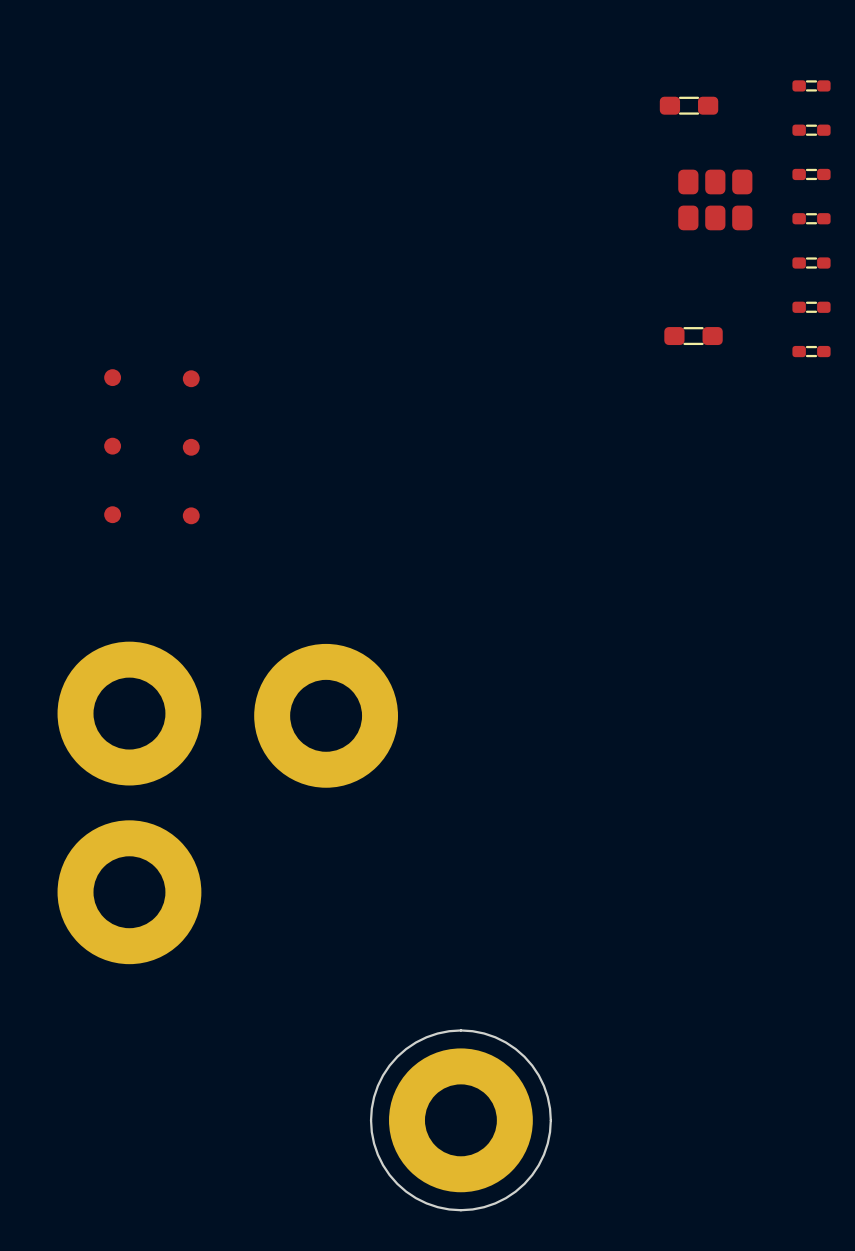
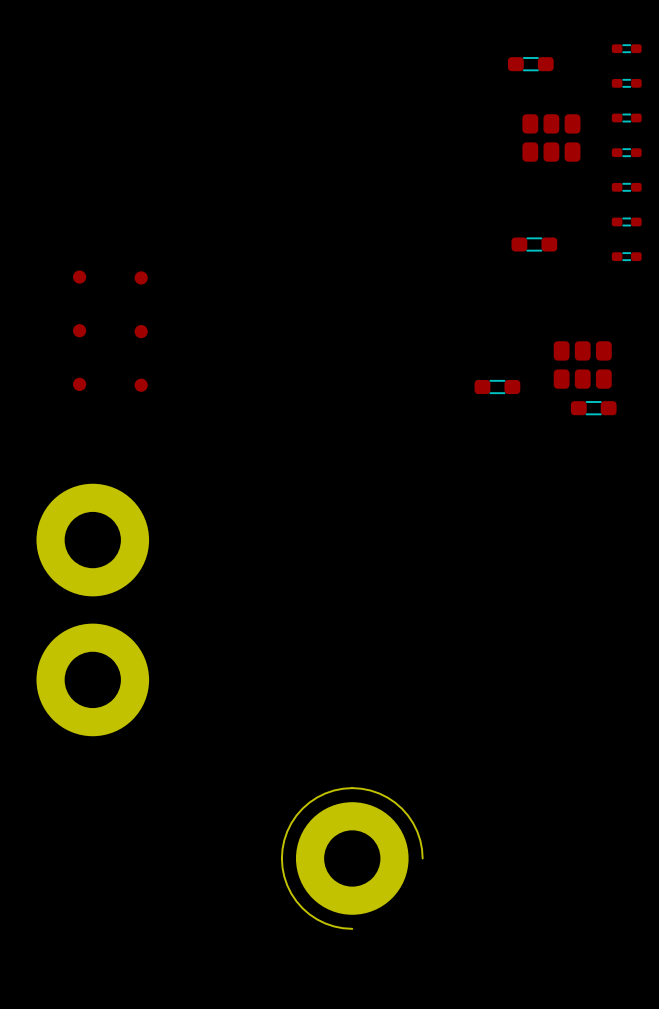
part: none -> (582, 365)
part: none -> (497, 387)
part: none -> (593, 408)
part: (326, 715) -> none
board edge: (550, 1120) (547, 1143) (543, 1154) (538, 1165) (524, 1183) (515, 1191) (495, 1203) (484, 1207) (460, 1210) -> none

